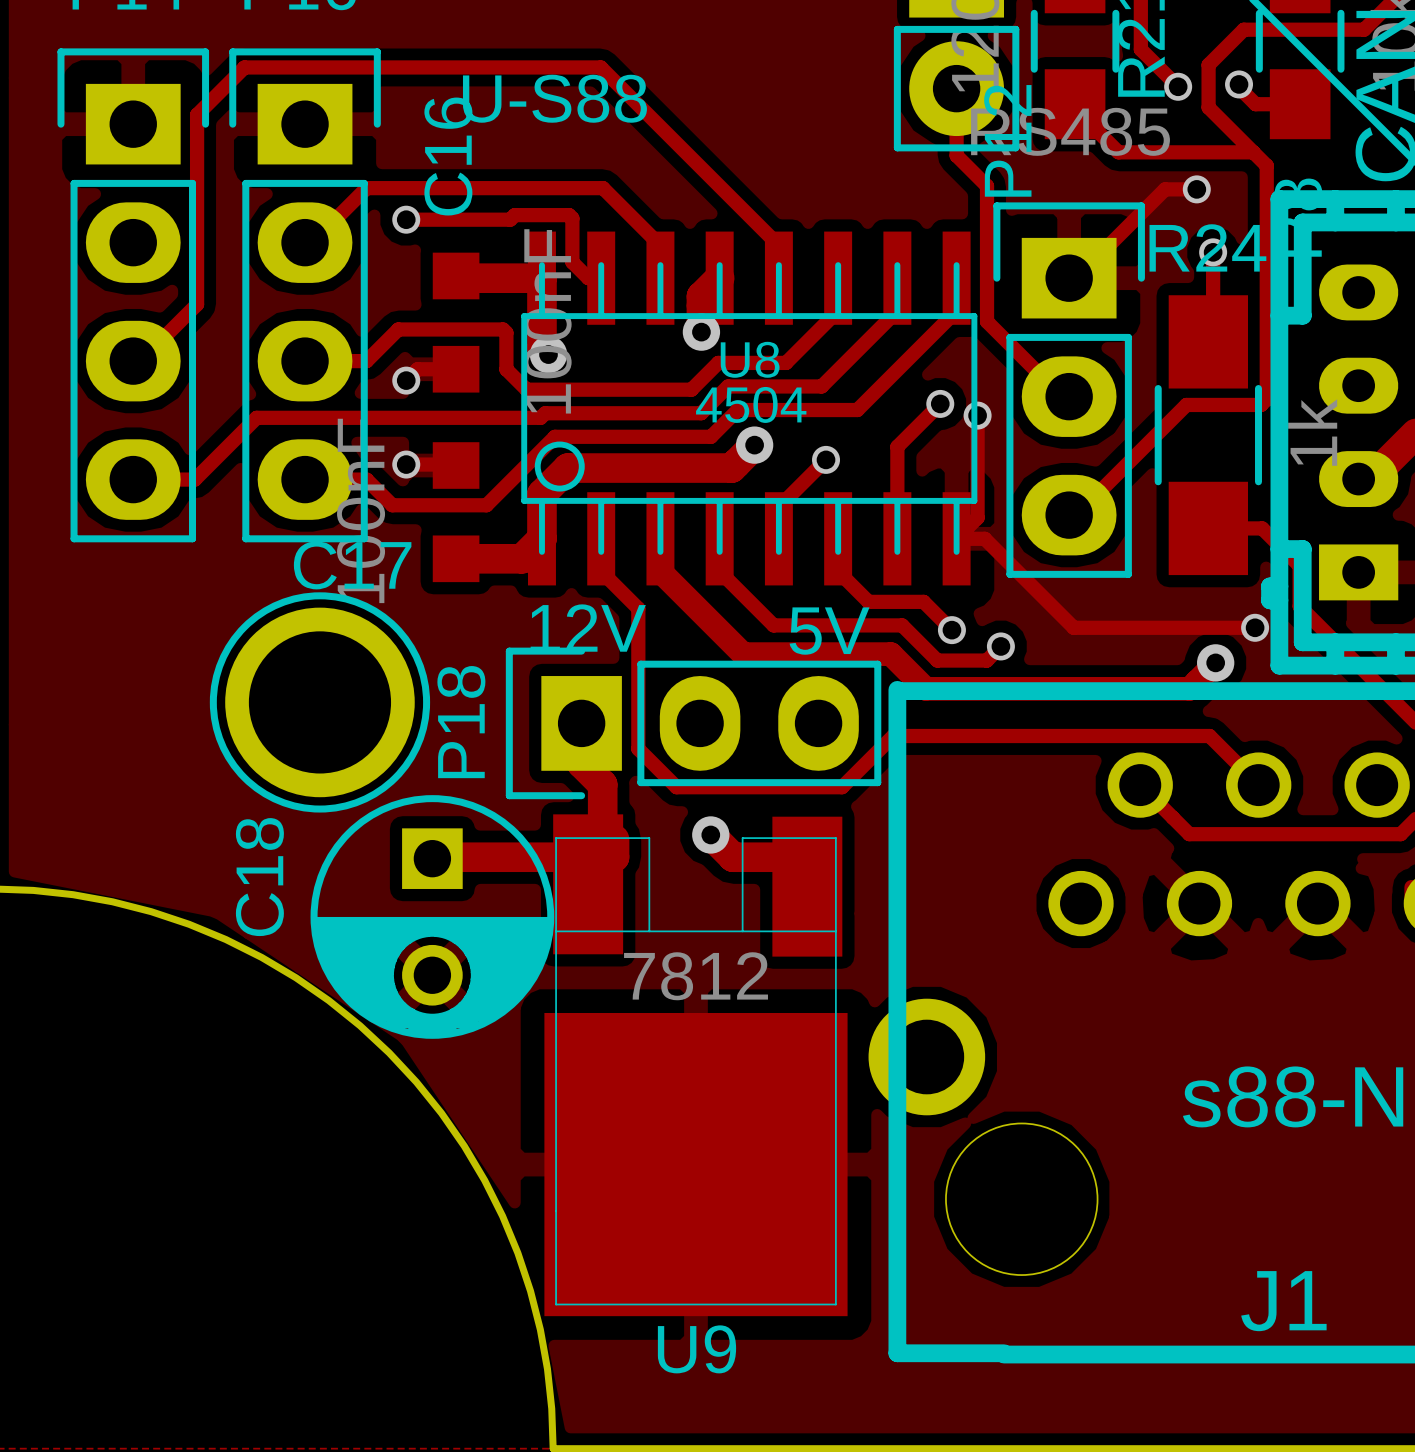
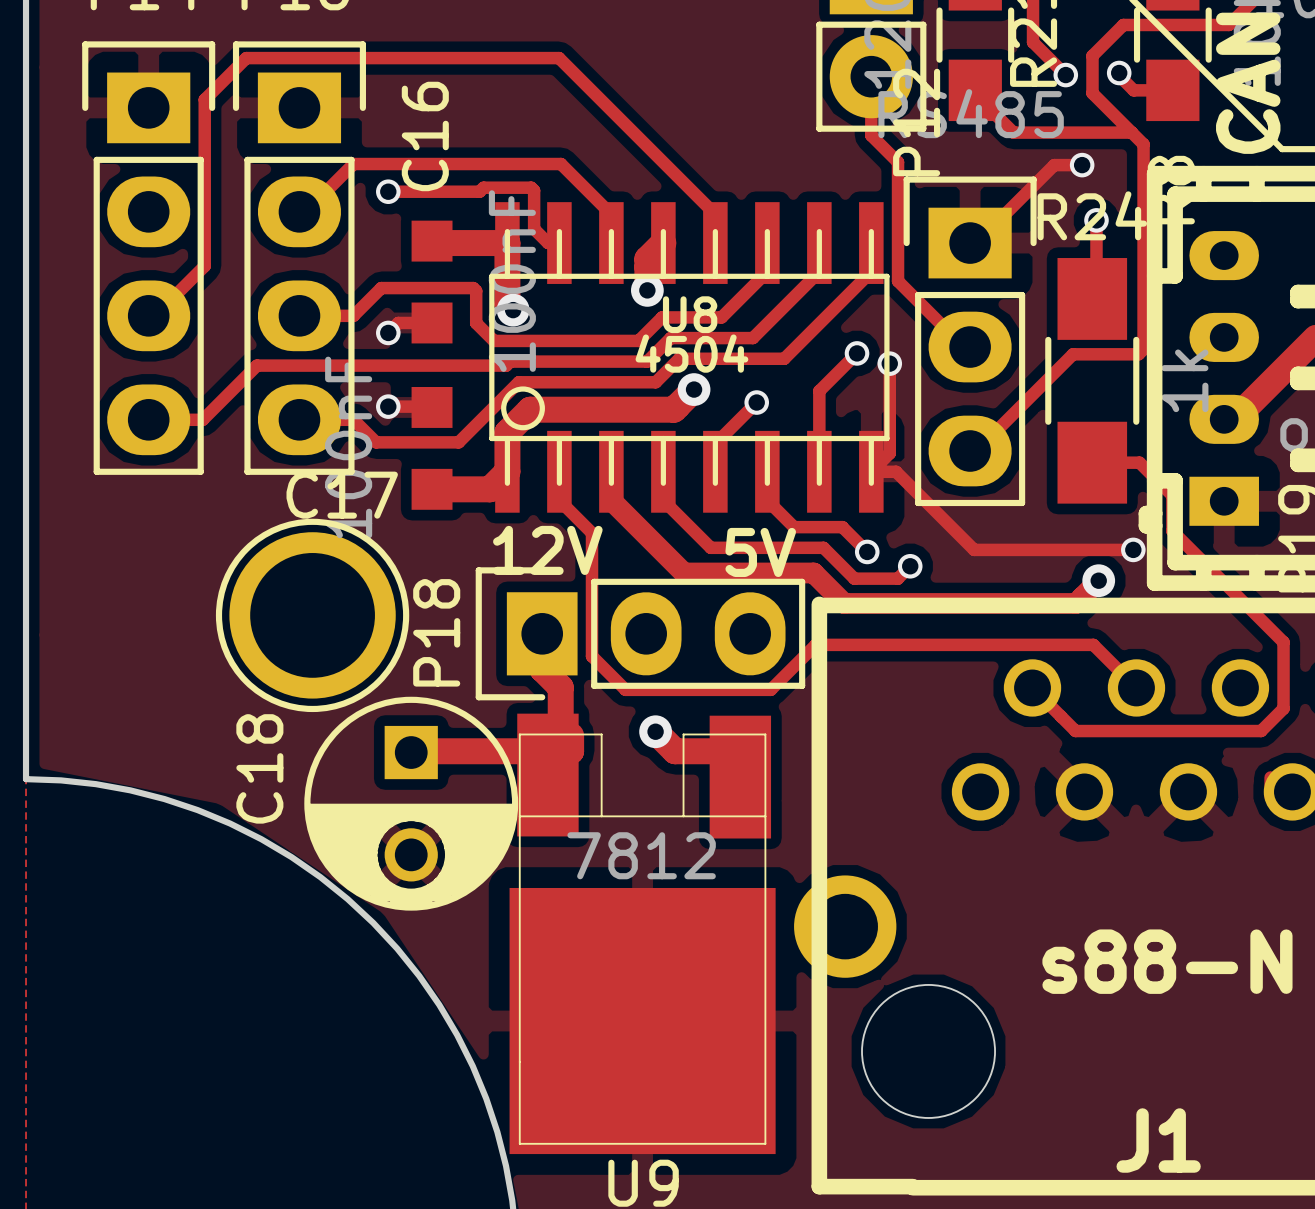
text: U-S88 (554, 98) -> none

